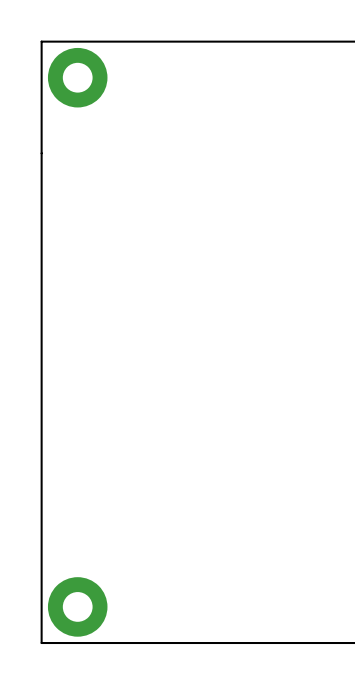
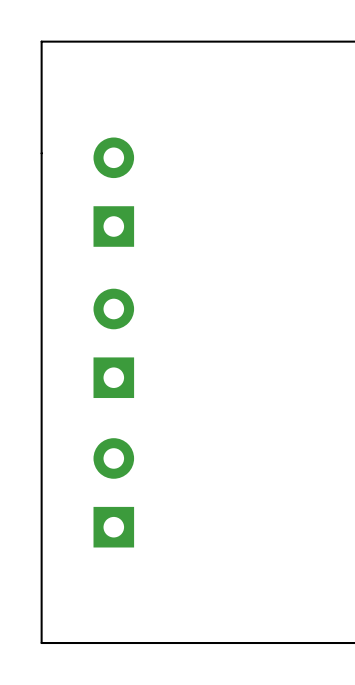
part: (77, 77) -> none
part: none -> (113, 192)
part: none -> (113, 343)
part: none -> (113, 492)
part: (77, 606) -> none

